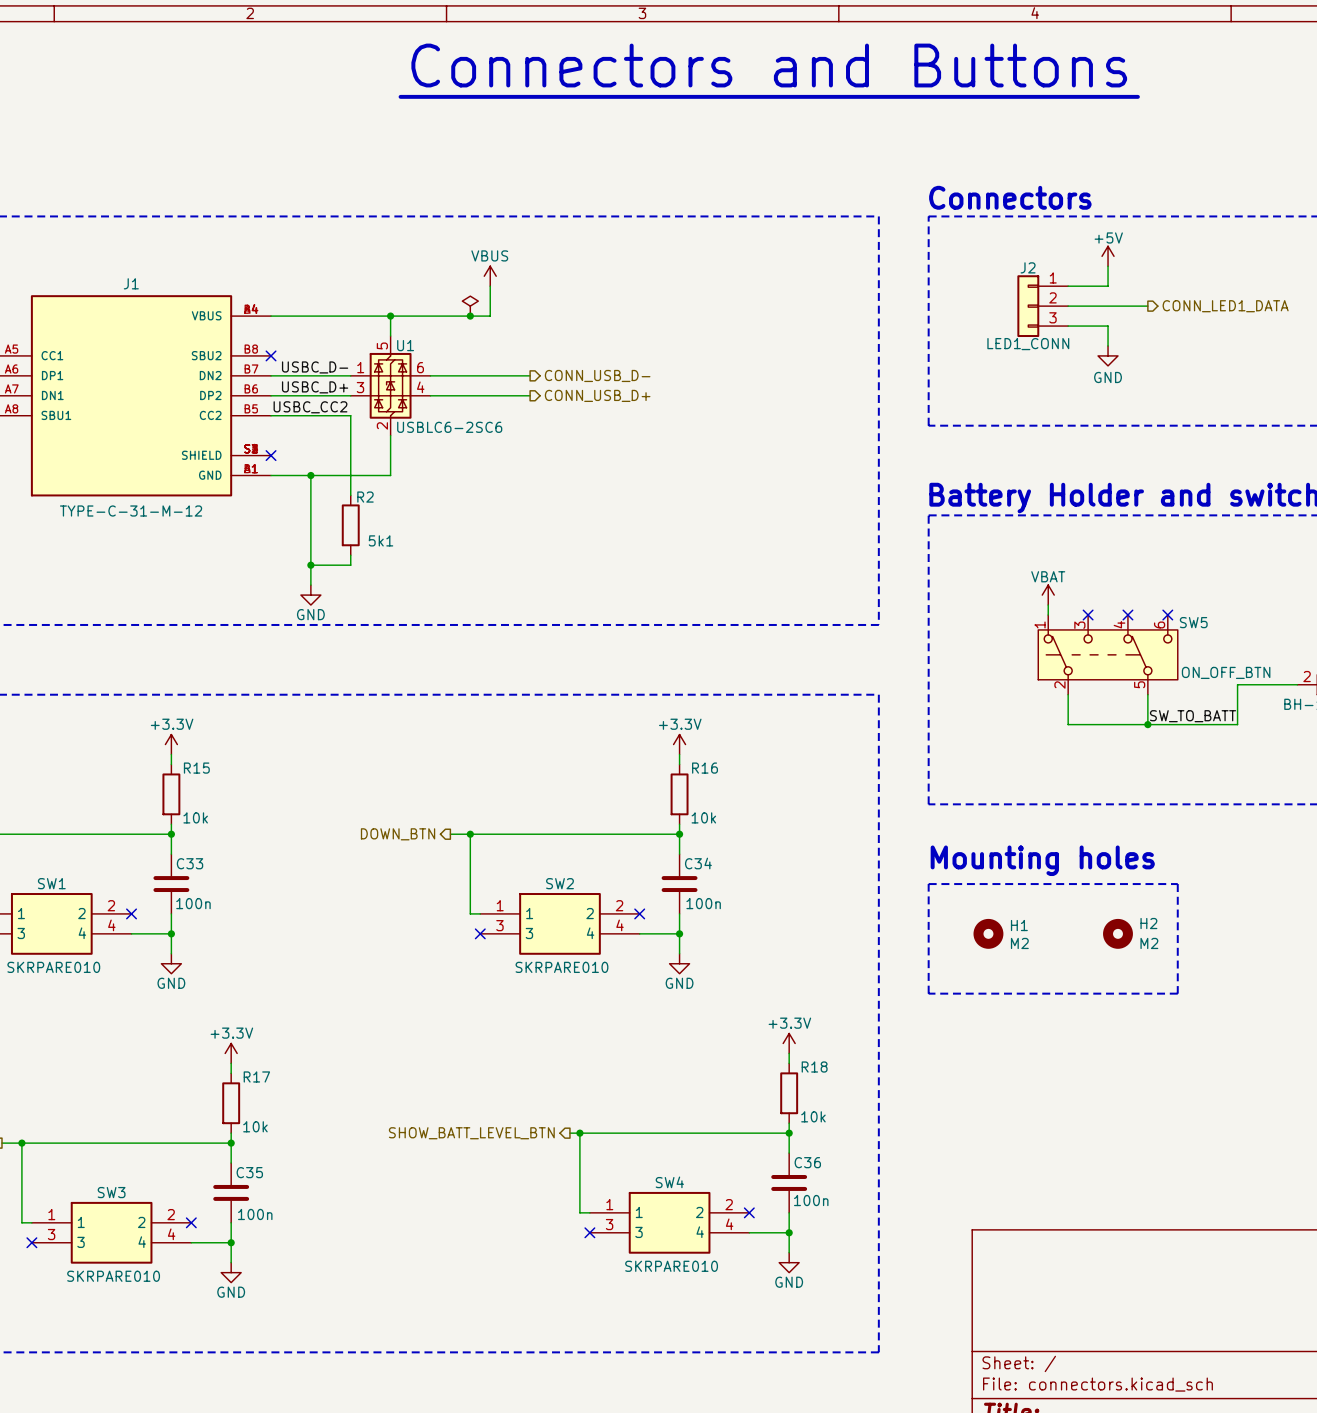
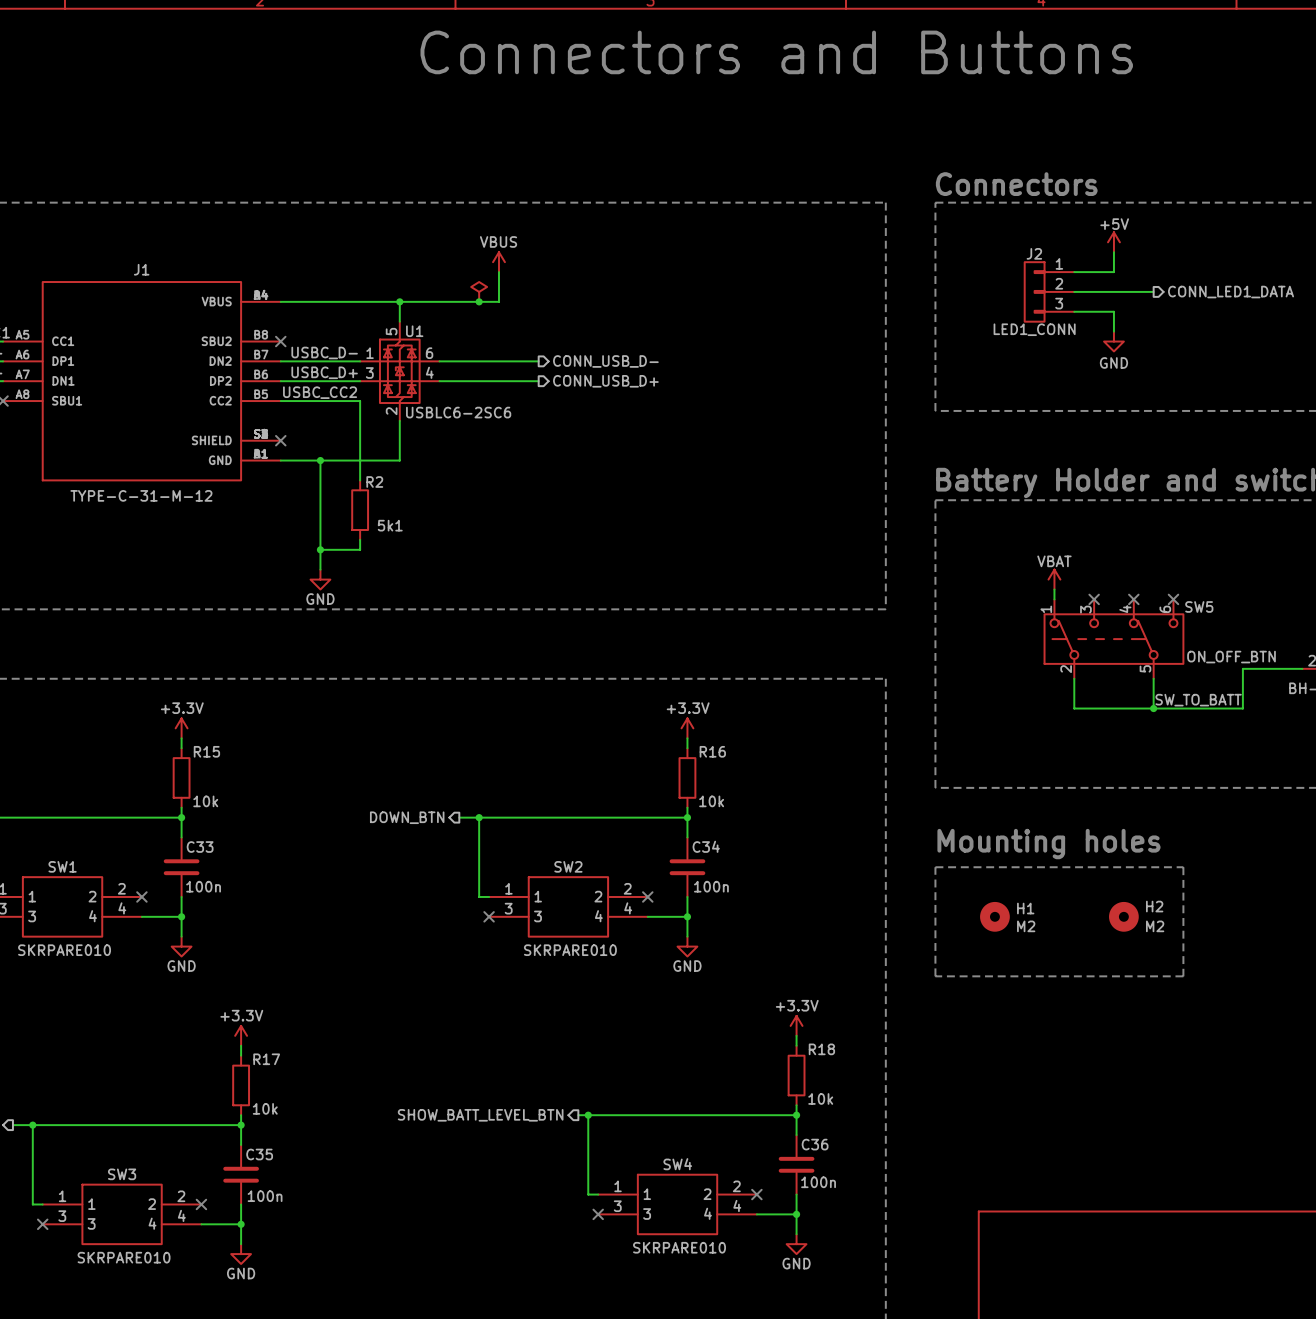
line: (400, 96) (1137, 96) -> none

